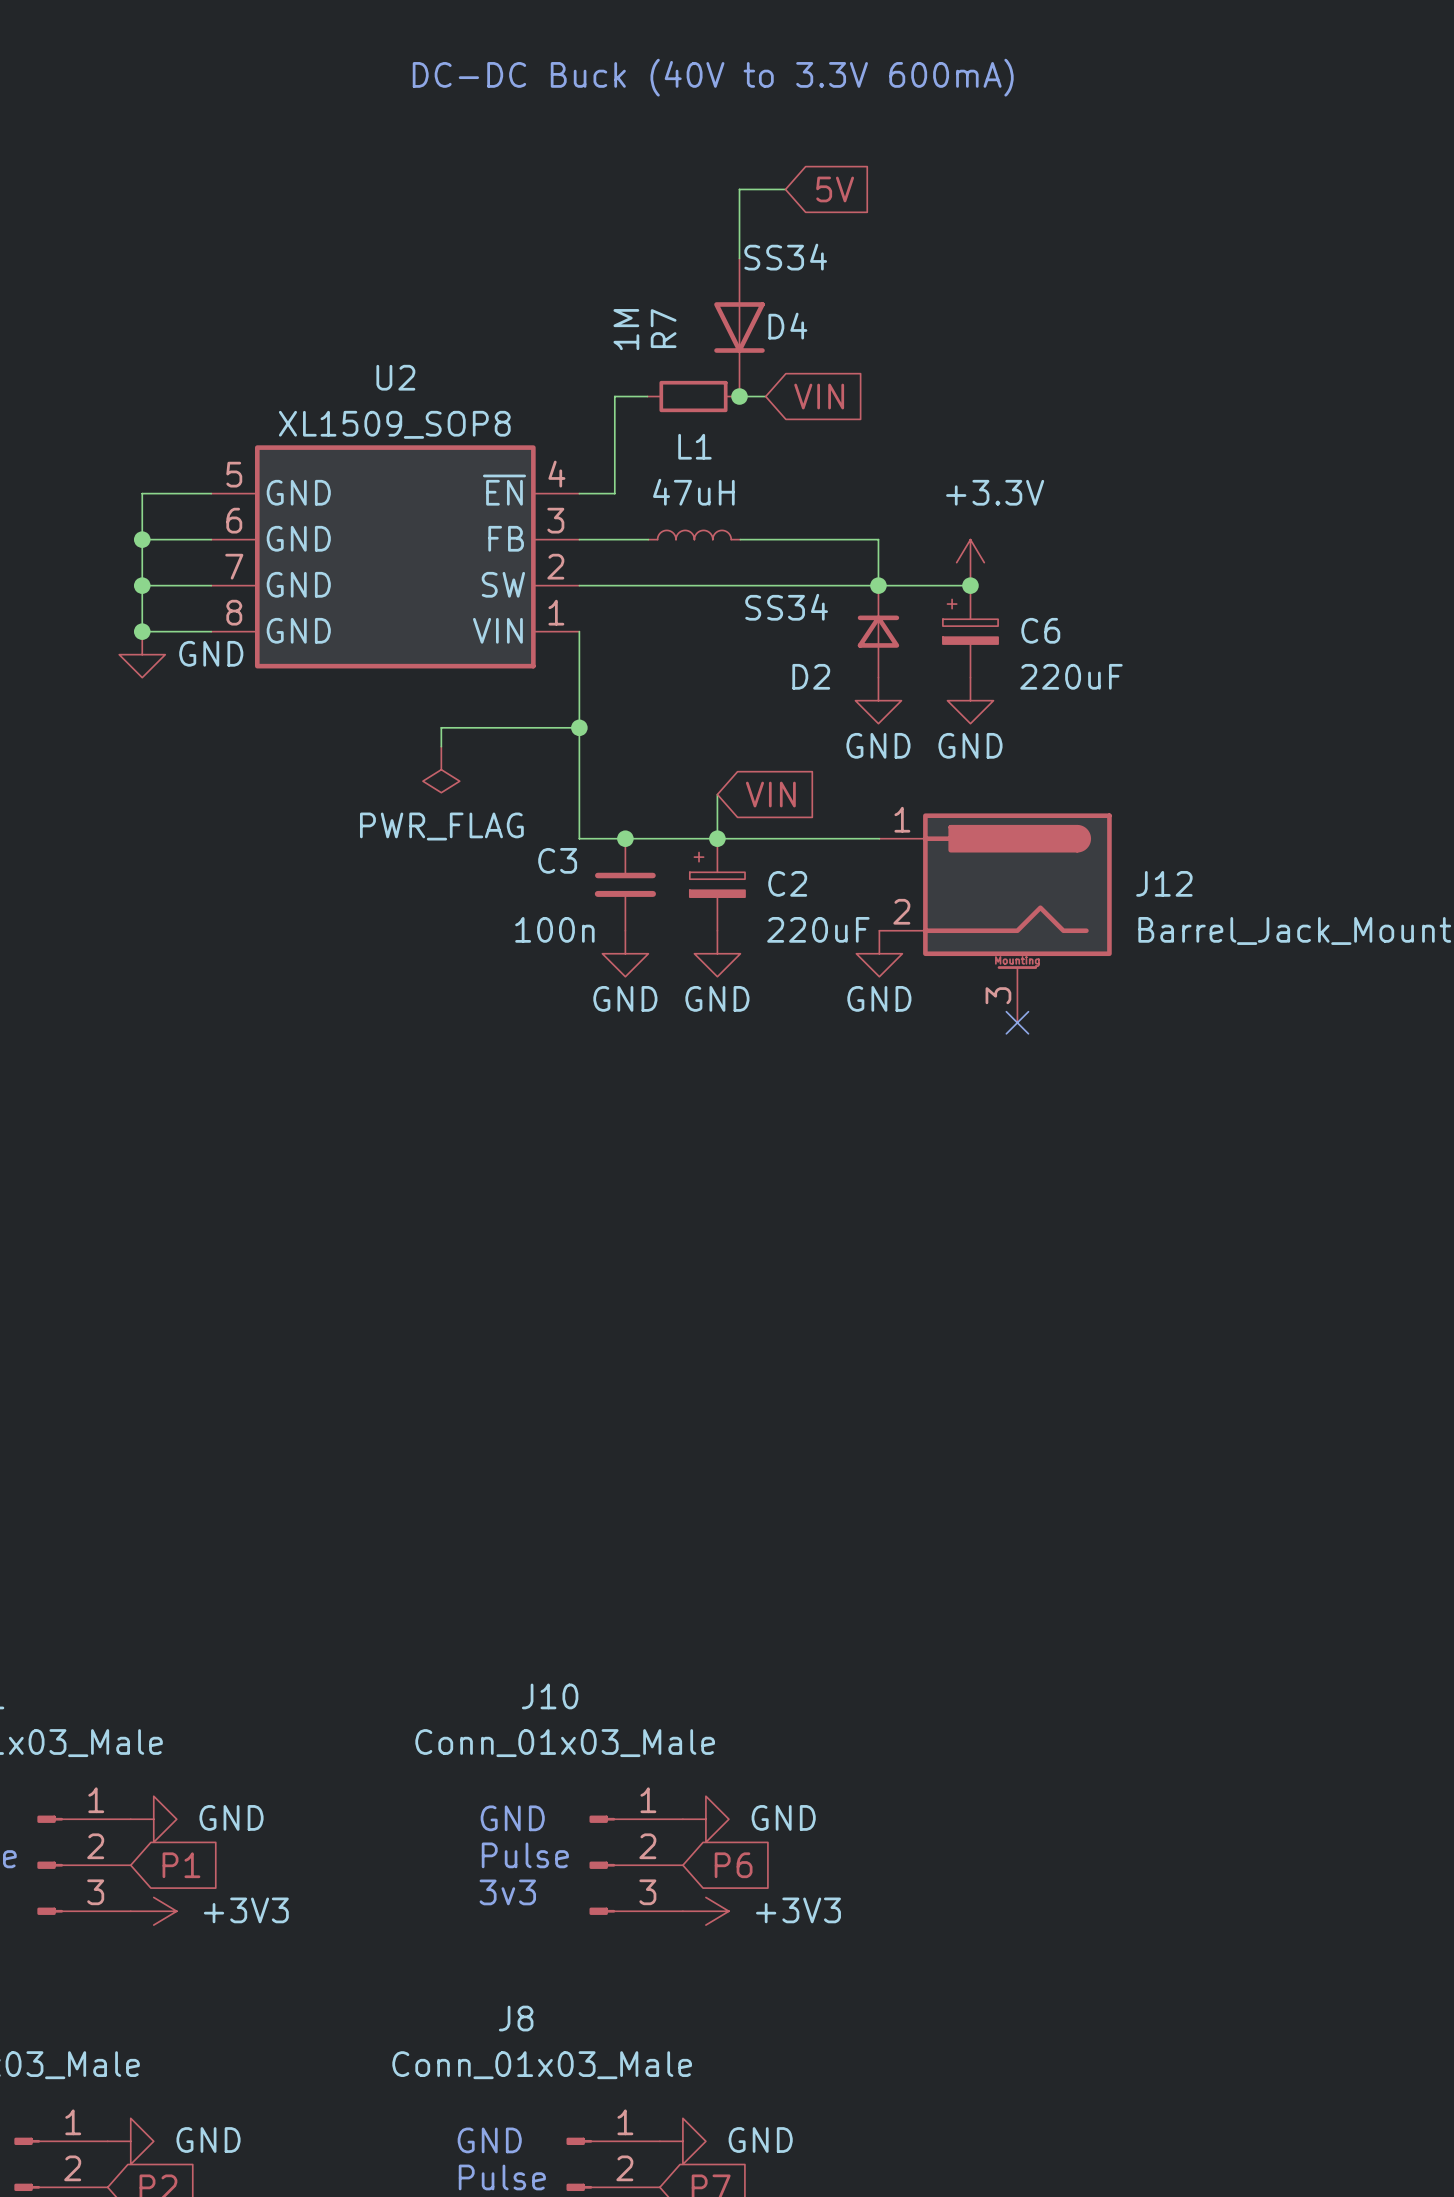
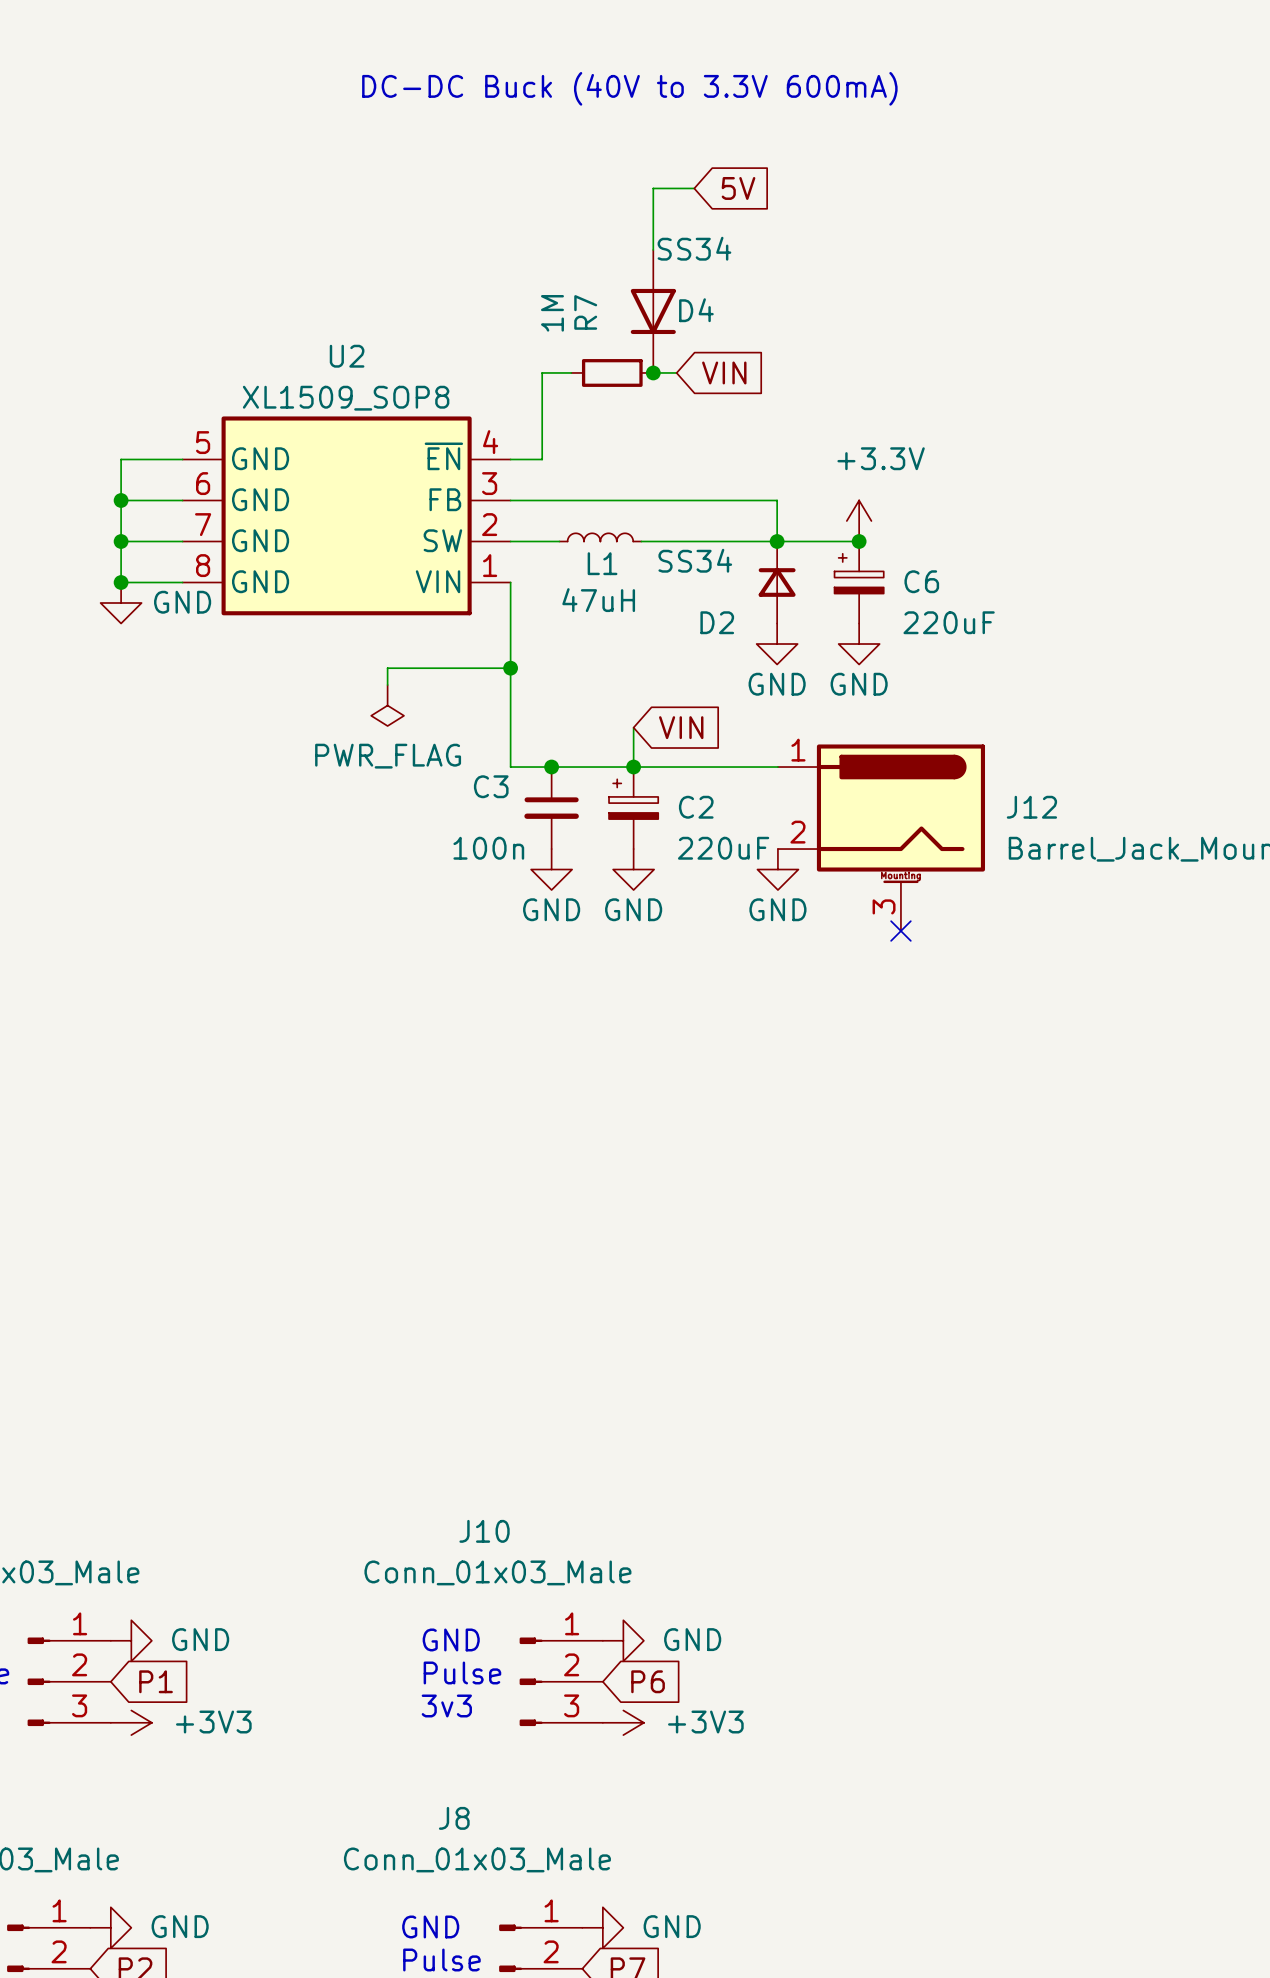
L1 name position: L1 (694, 446) -> L1 (602, 563)
L1 value position: 47uH (693, 492) -> 47uH (598, 600)
L1 position: (694, 535) -> (600, 537)
wire: (634, 585) (726, 585) -> (572, 500) (654, 500)

